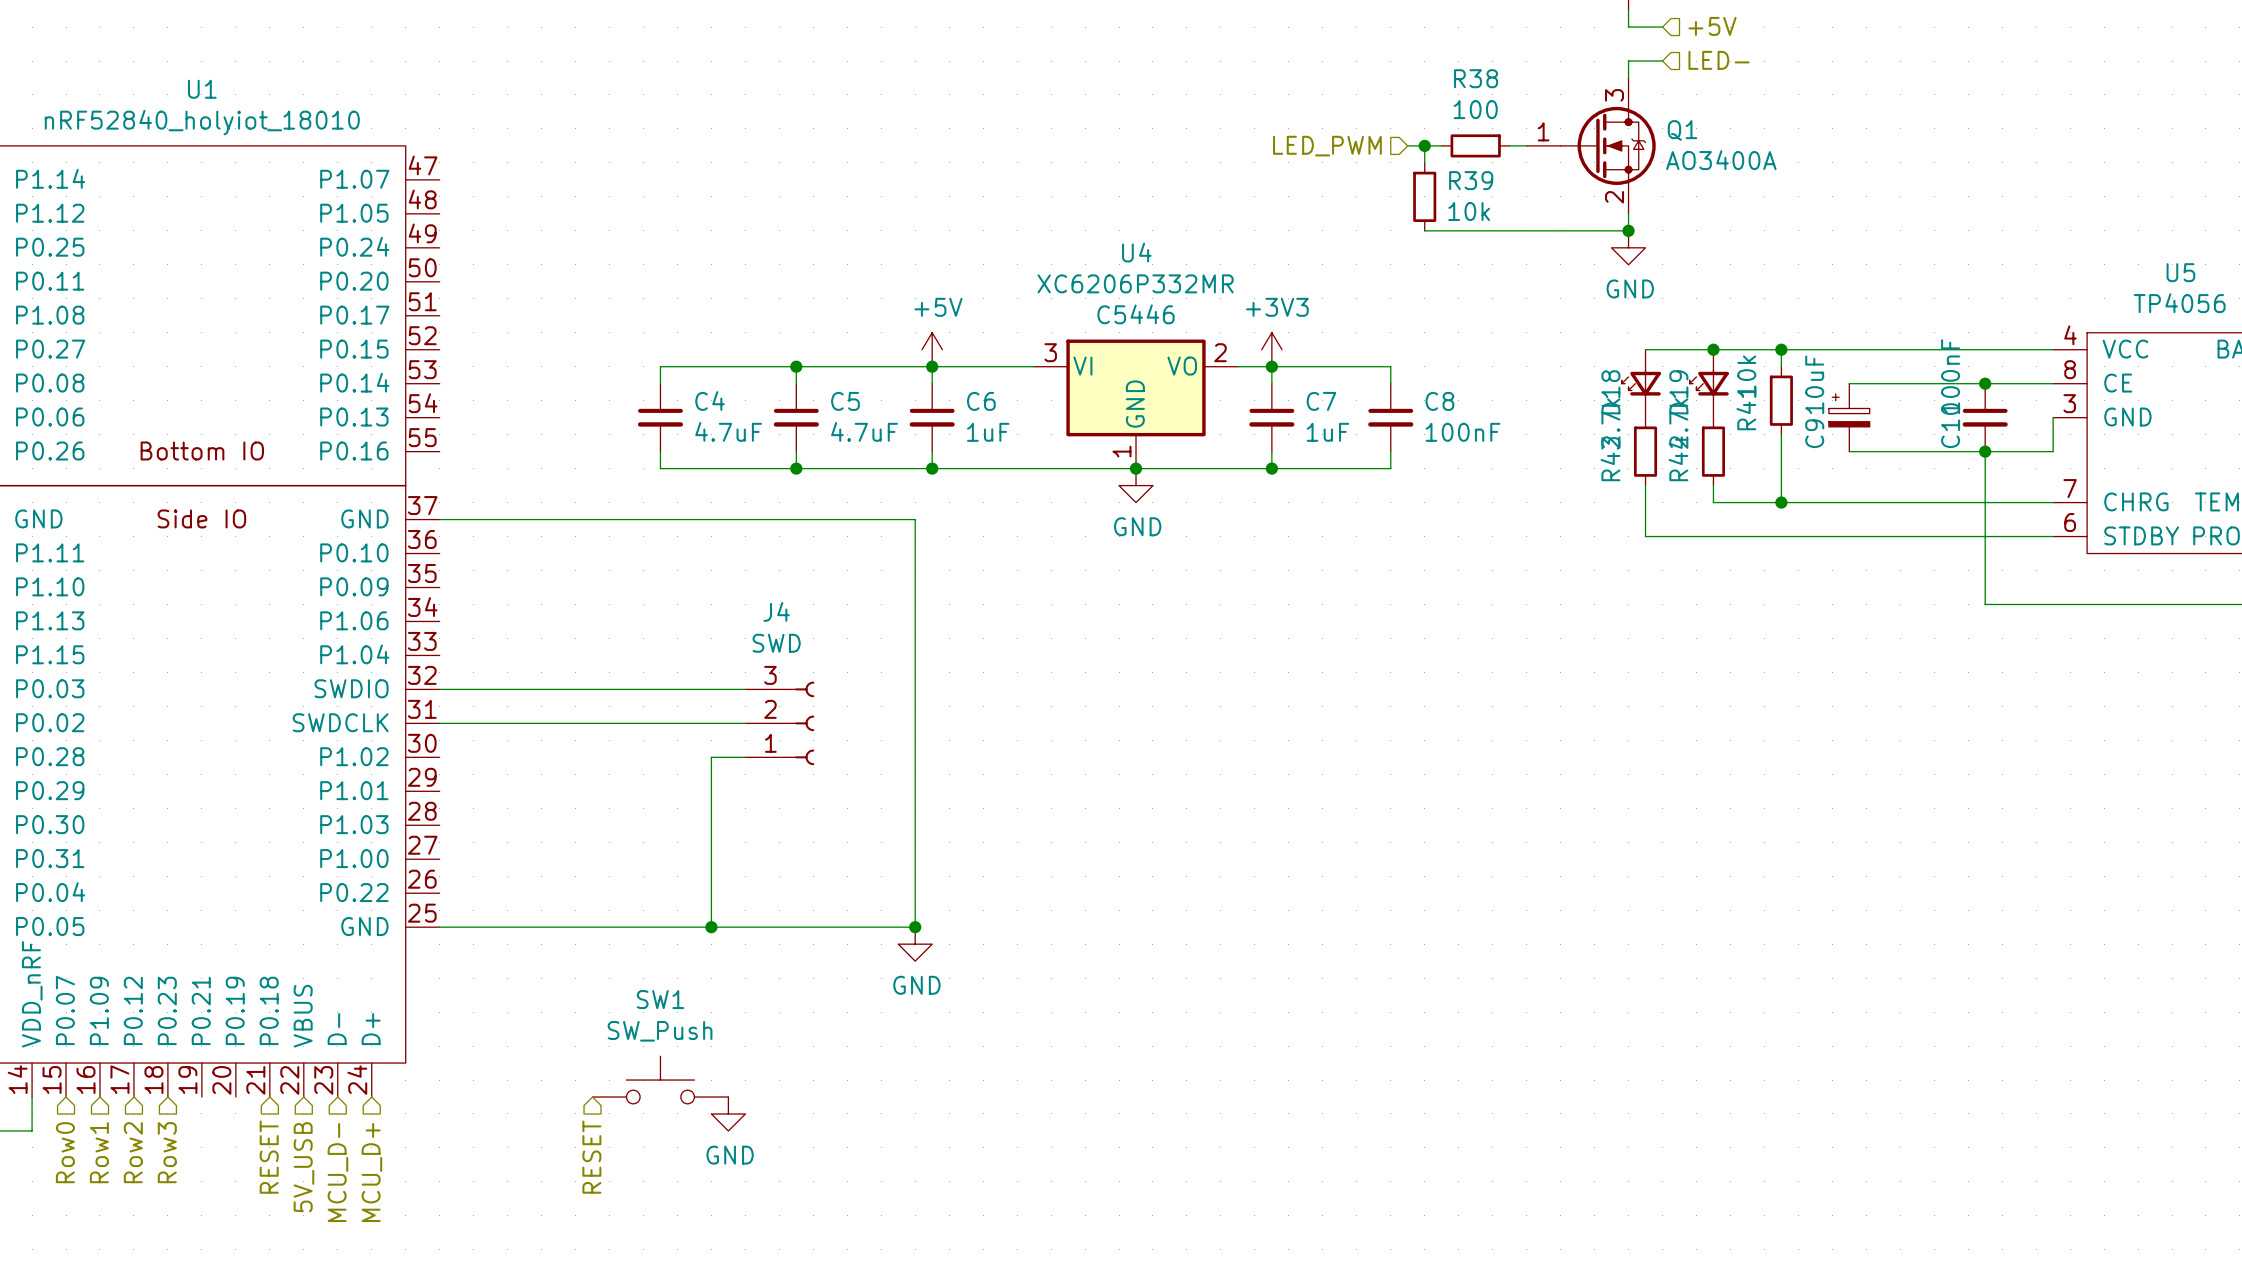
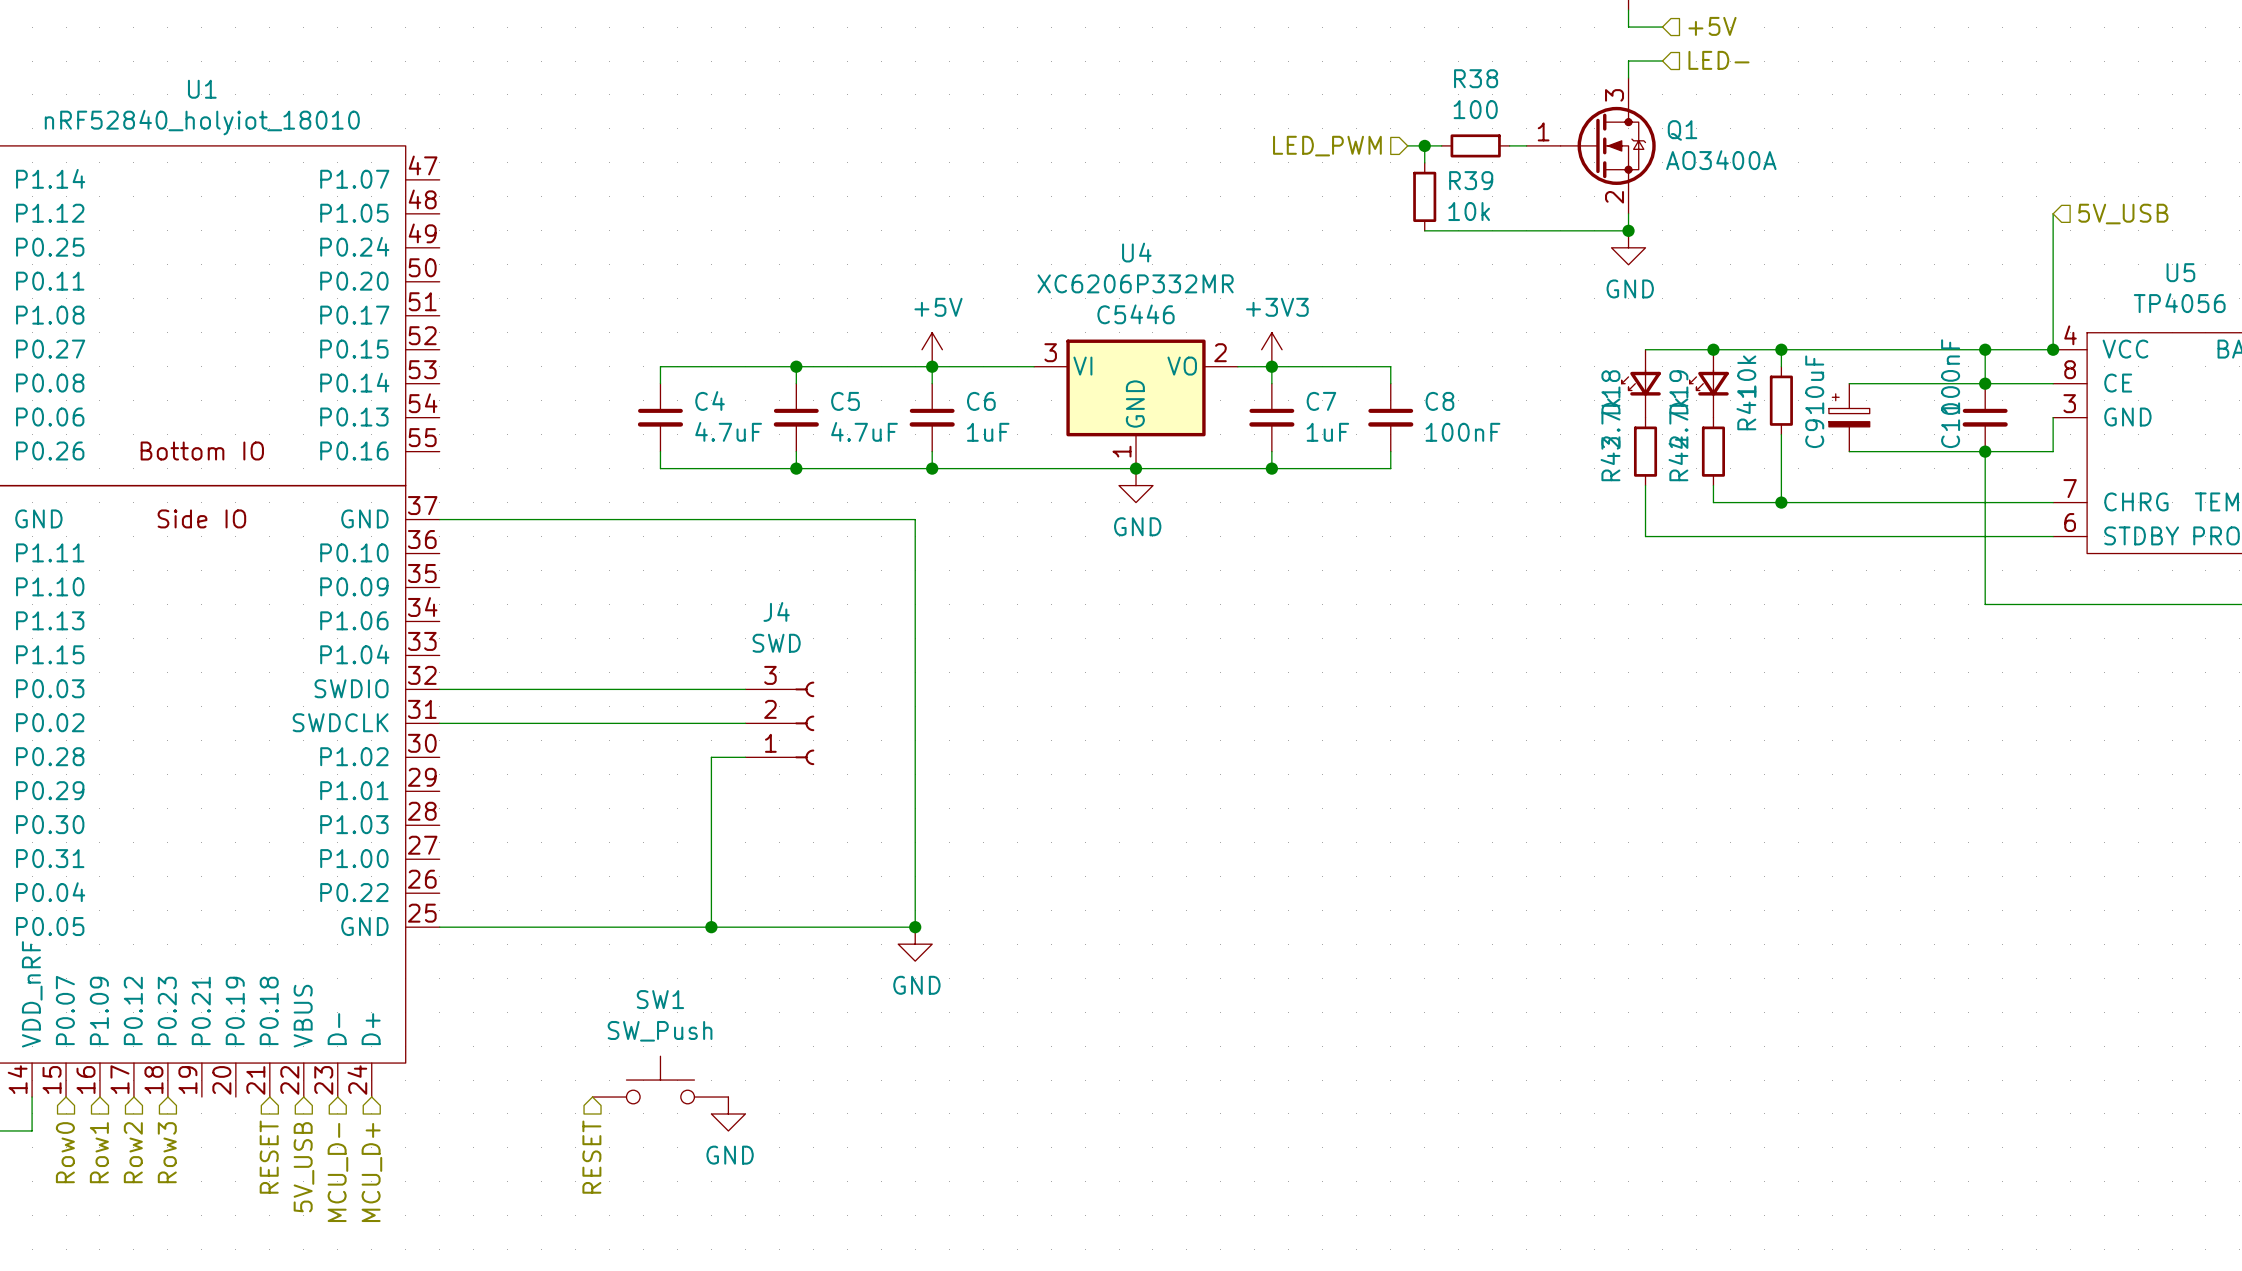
wire: none -> (2053, 213) (2053, 349)
hierarchical label: none -> 5V_USB (2123, 214)
wire: none -> (1985, 349) (1985, 383)
junction: none -> (1985, 349)
junction: none -> (2053, 349)

